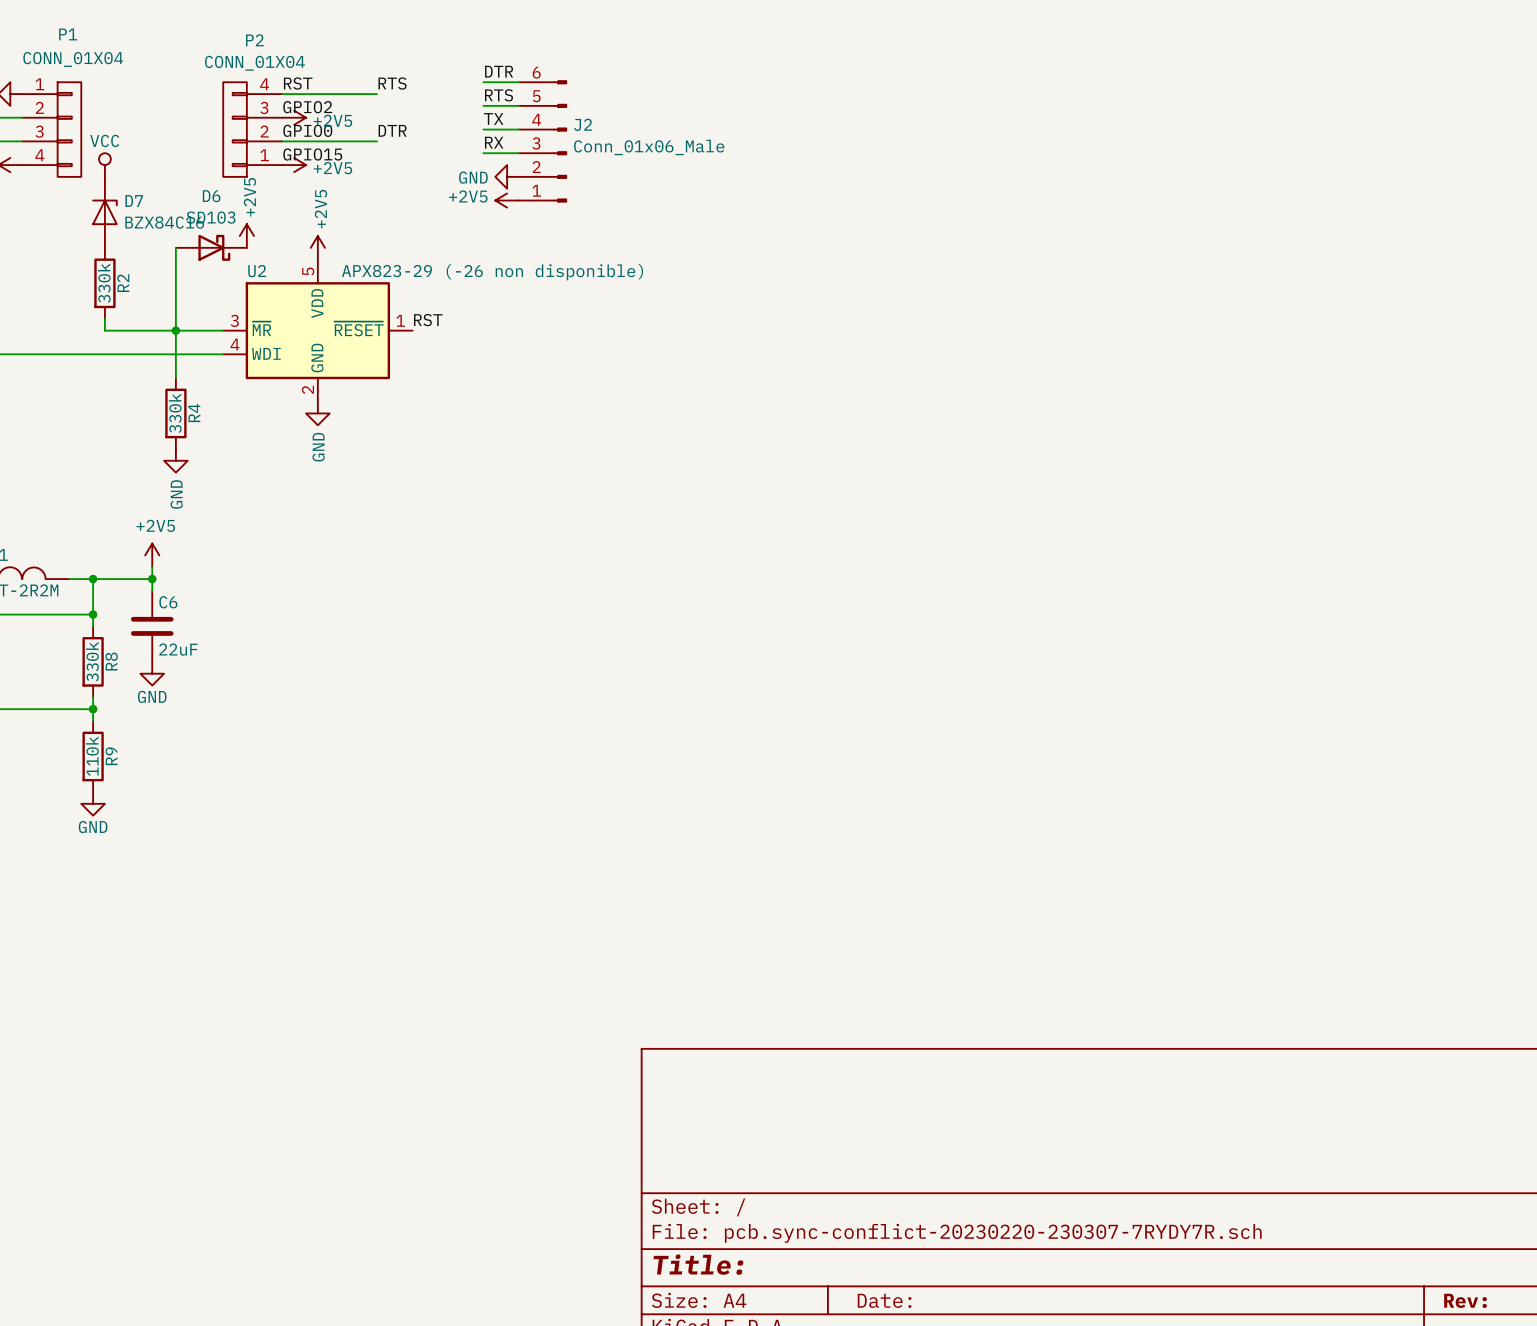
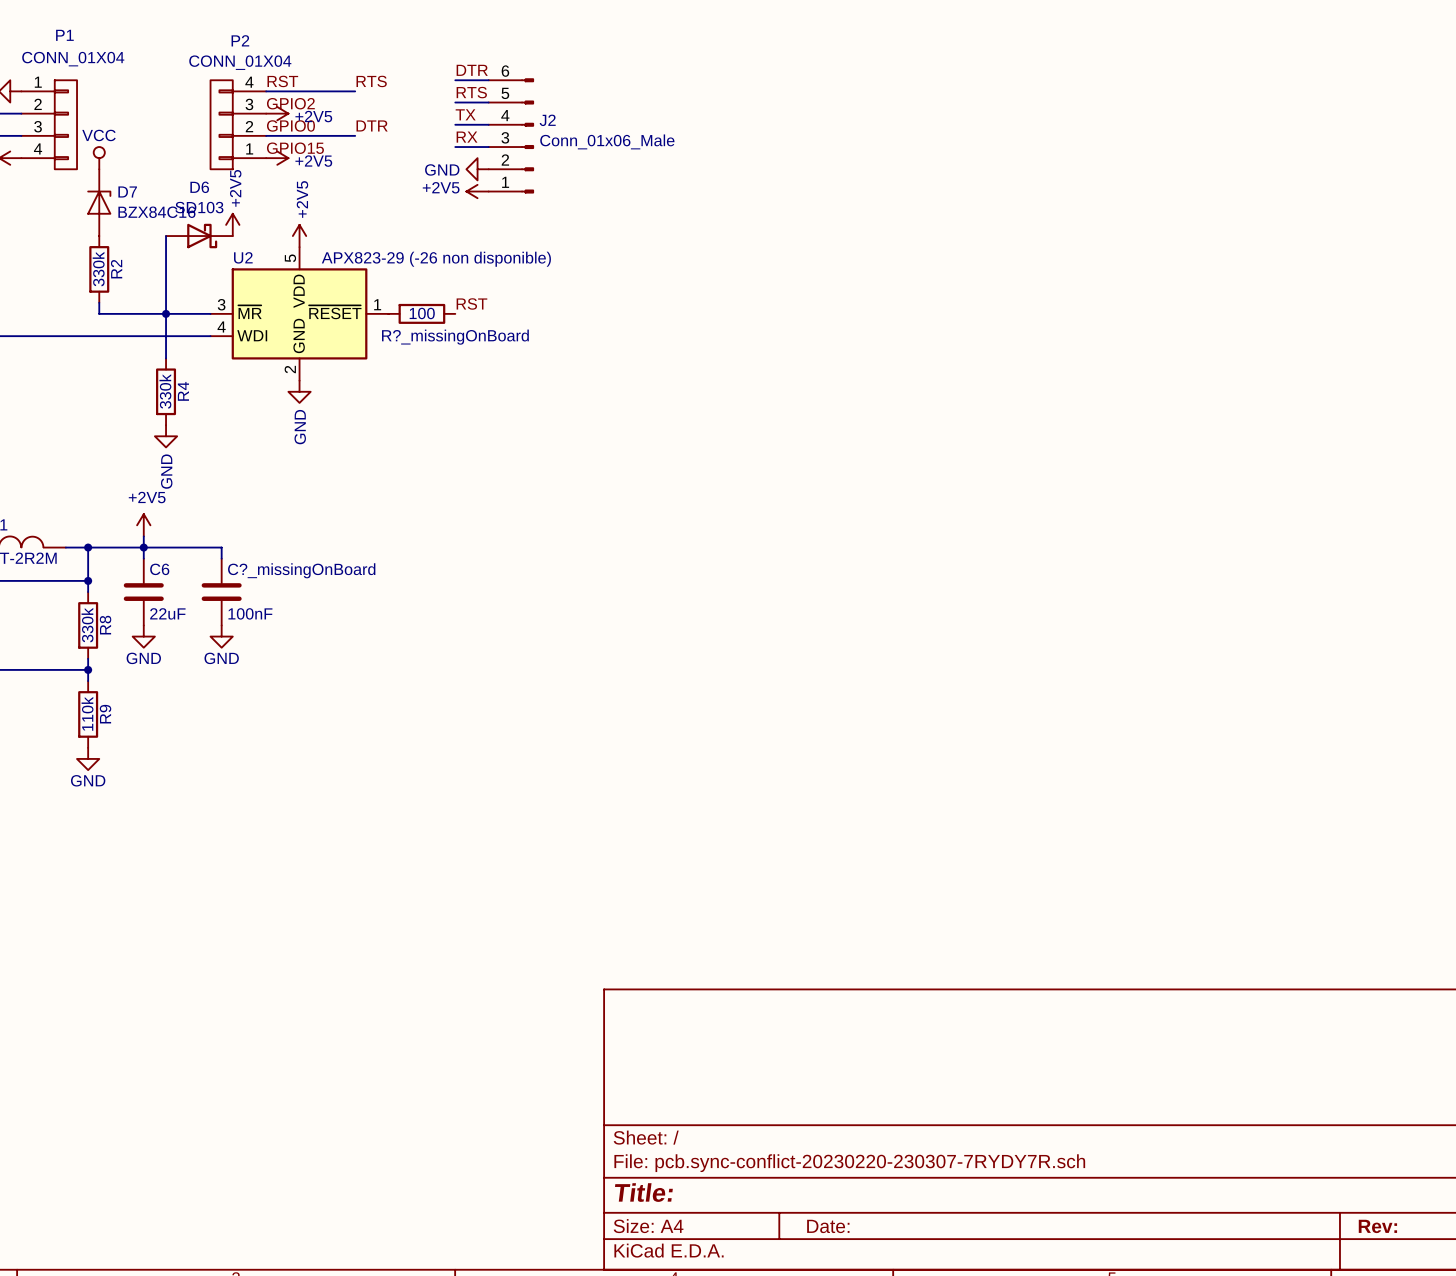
label position: RST (428, 320) -> RST (471, 303)
R?_missingOnBoard: none -> 100 (421, 313)
wire: none -> (143, 547) (221, 547) (221, 558)
C?_missingOnBoard: none -> 100nF (221, 592)
power symbol: none -> GND (221, 636)

